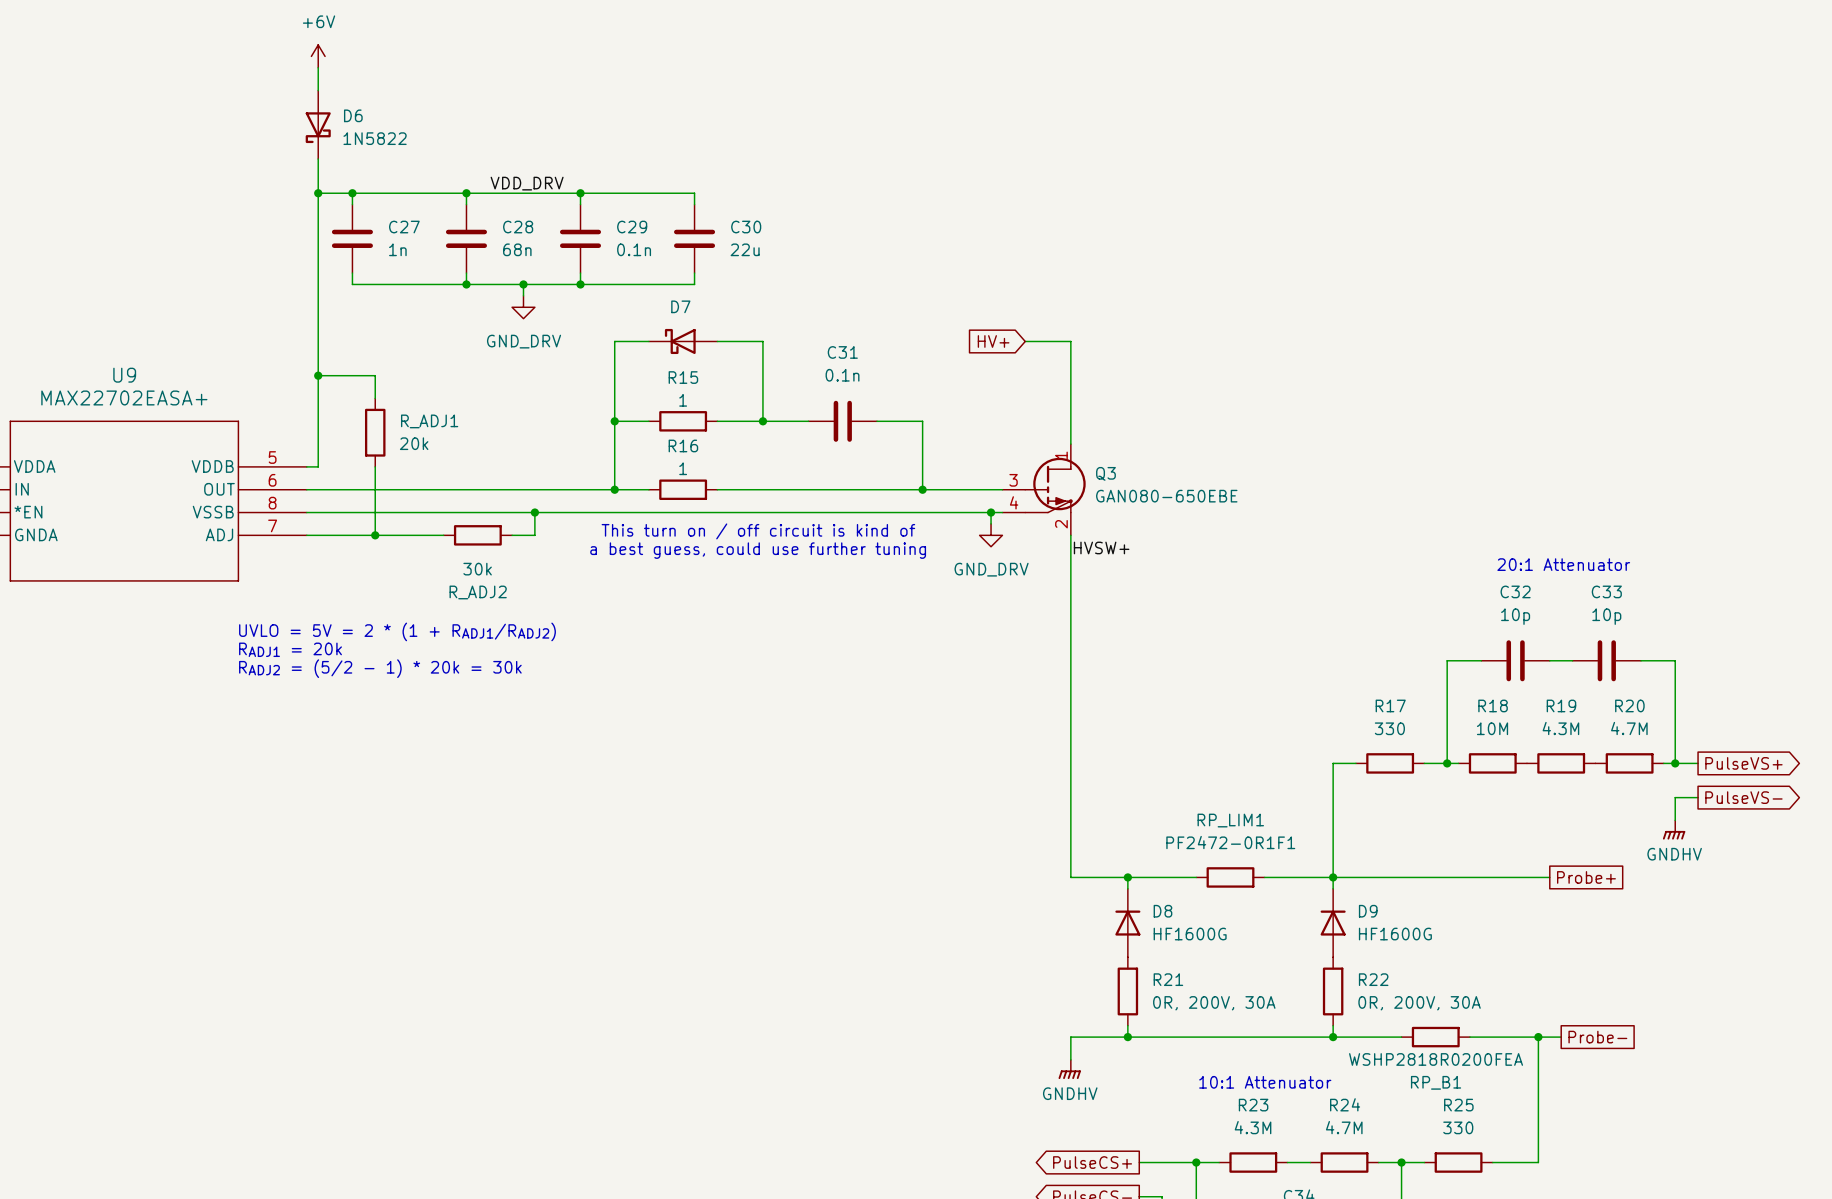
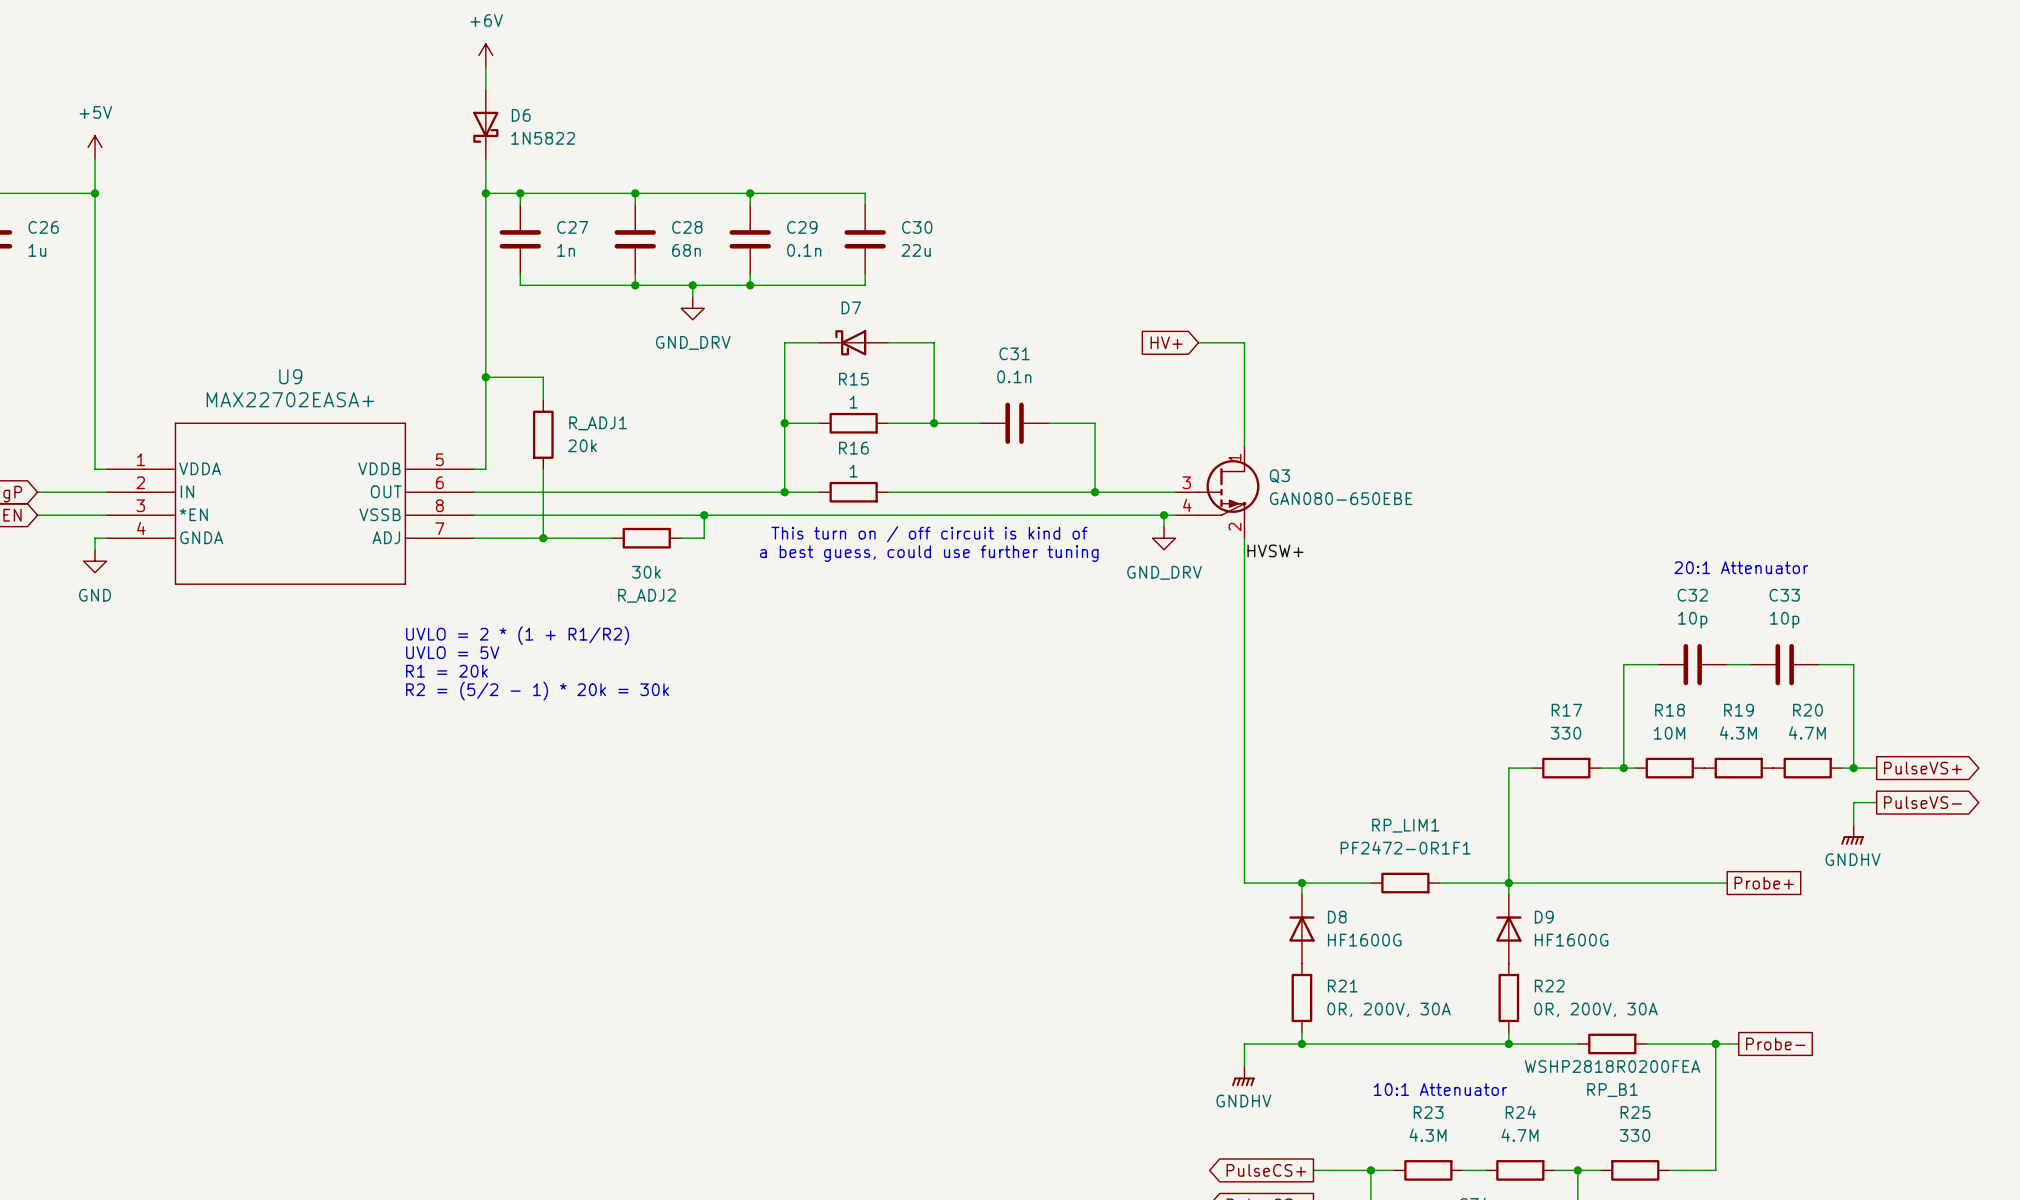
label: VDD_DRV (527, 183) -> none
text: UVLO = 5V = 2 * (1 + RADJ1/RADJ2) (397, 631) -> UVLO = 2 * (1 + R1/R2) (517, 635)
text: RADJ1 = 20k (290, 649) -> UVLO = 5V (452, 652)
text: RADJ2 = (5/2 - 1) * 20k = 30k (380, 668) -> R1 = 20k (446, 671)
text: none -> R2 = (5/2 - 1) * 20k = 30k (537, 691)

